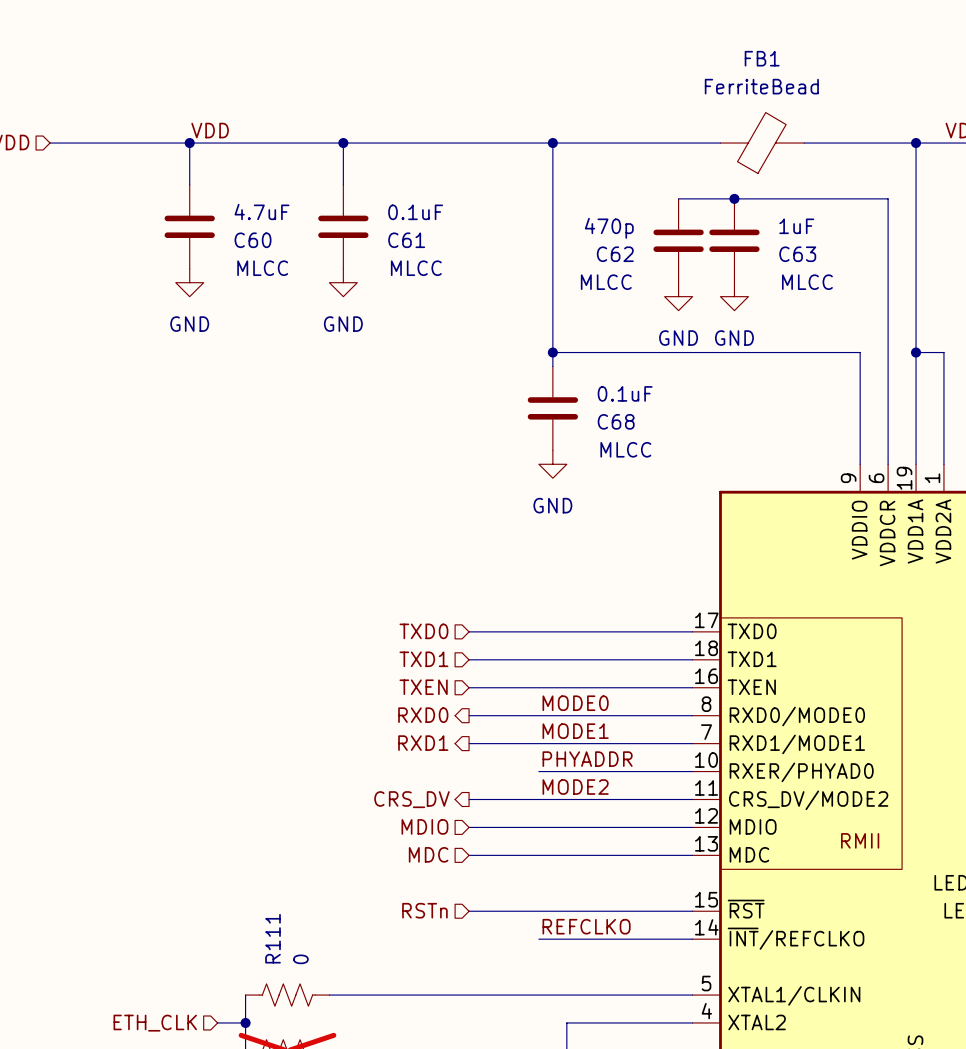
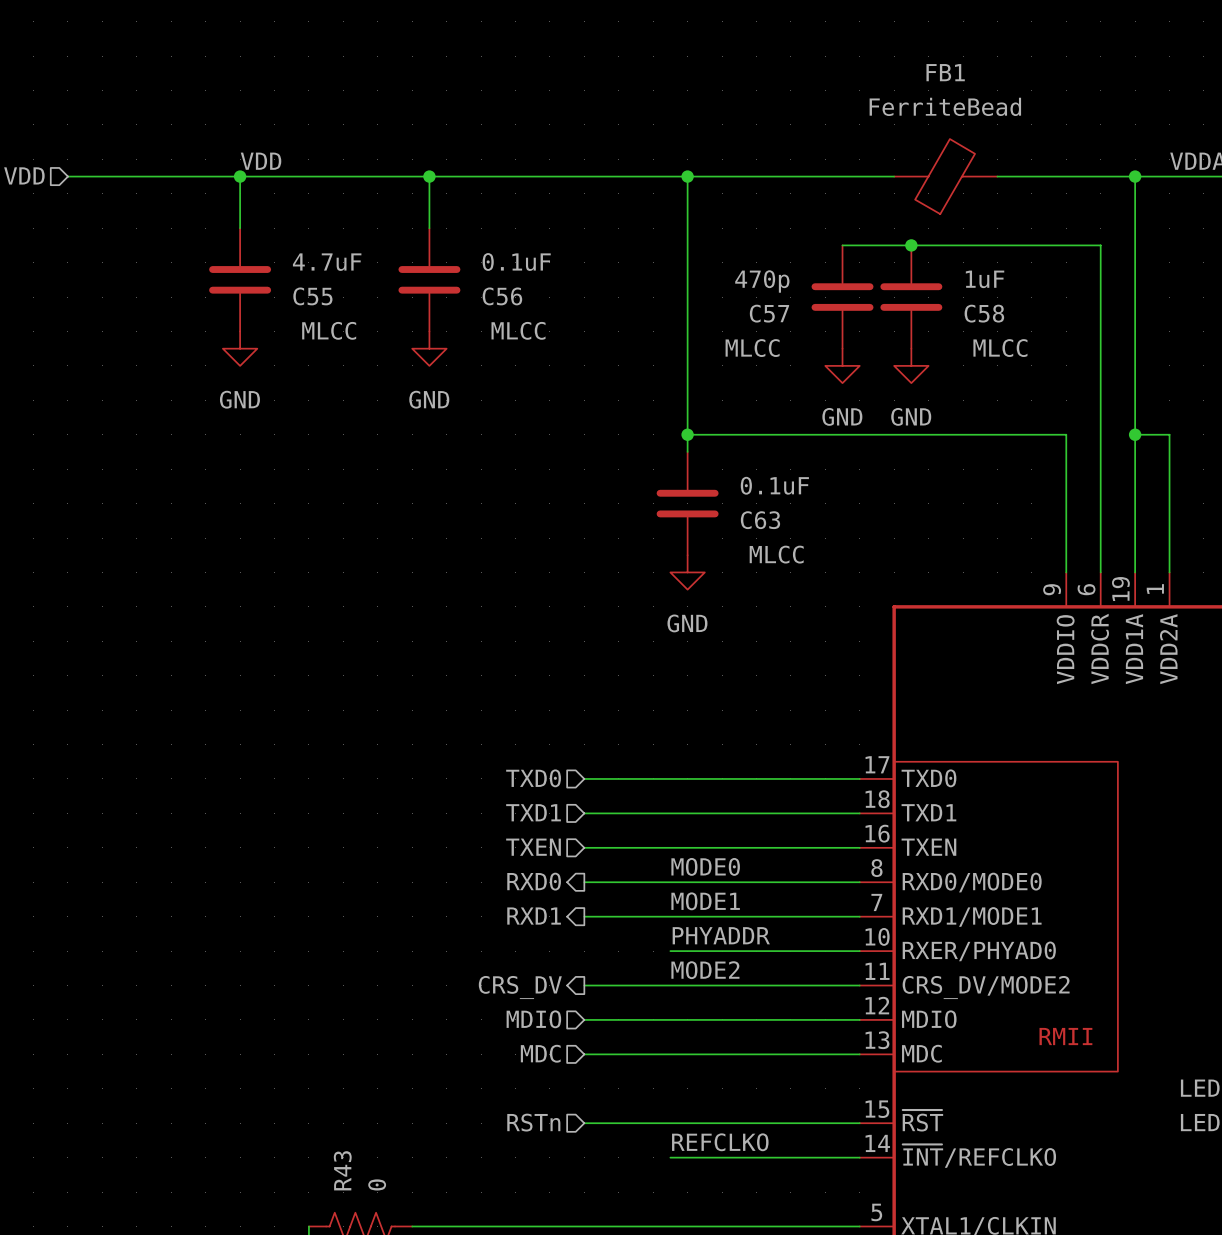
C60 name: C60 (253, 240) -> C55 (312, 296)
C61 name: C61 (406, 240) -> C56 (502, 296)
C62 name: C62 (615, 254) -> C57 (769, 313)
C63 name: C63 (797, 254) -> C58 (984, 313)
C68 name: C68 (616, 421) -> C63 (760, 520)
R111 name: R111 (272, 938) -> R43 (342, 1170)

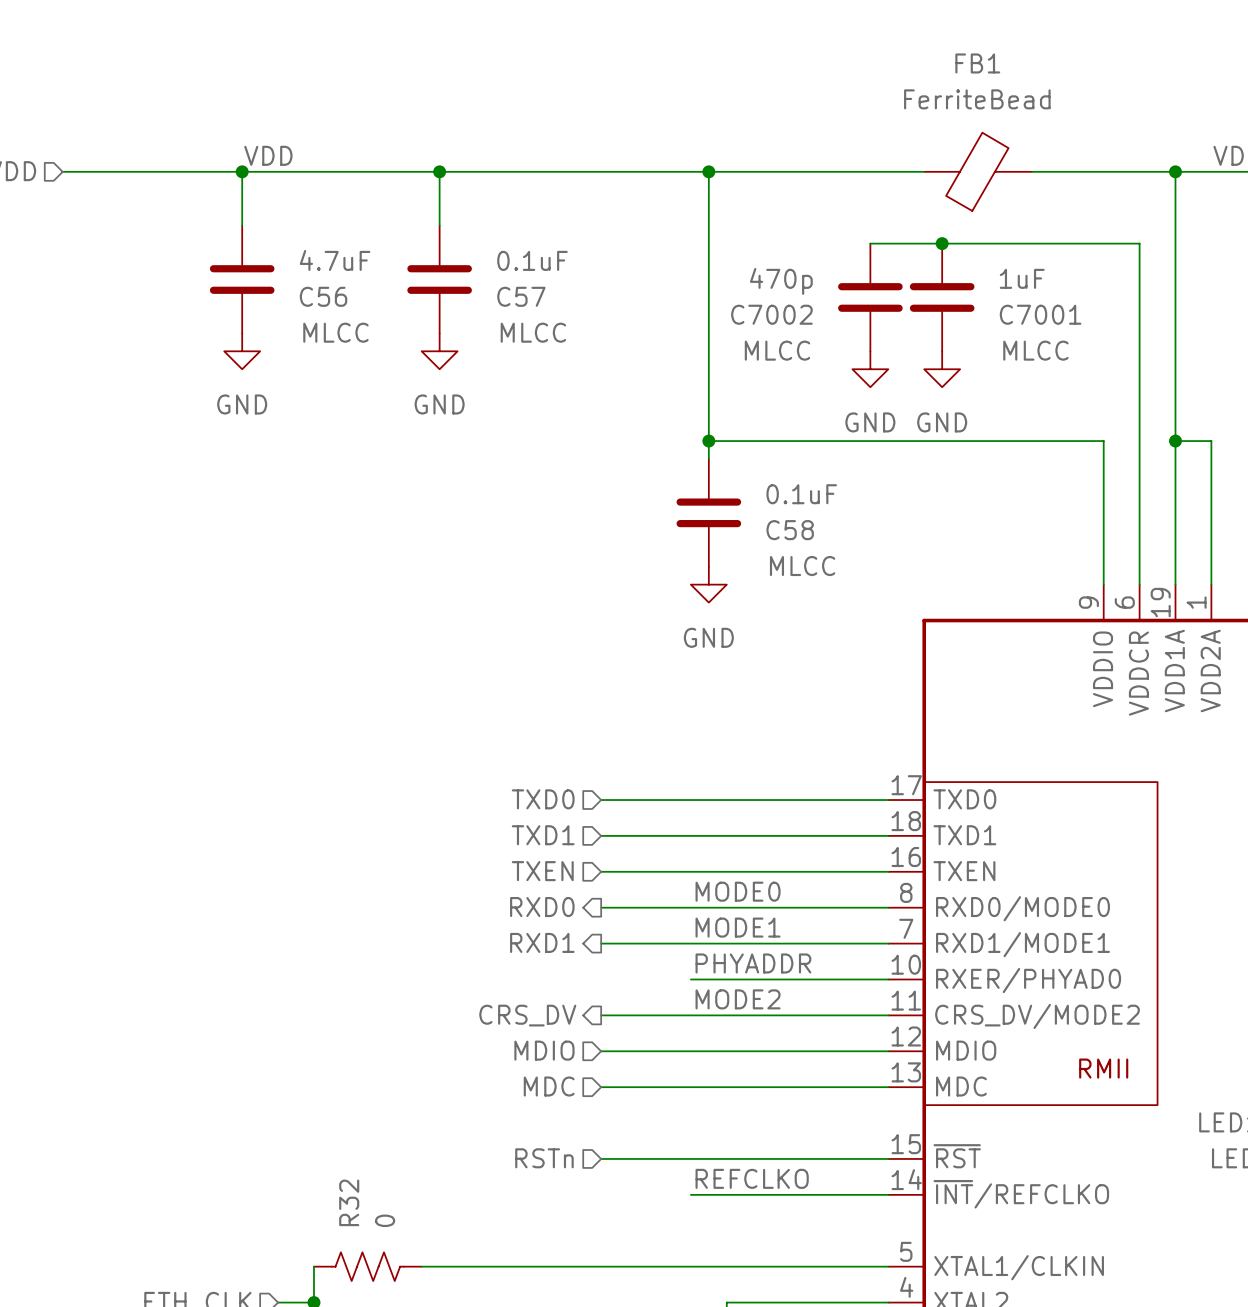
C55 name: C55 (312, 296) -> C56 (323, 296)
C56 name: C56 (502, 296) -> C57 (521, 296)
C57 name: C57 (769, 313) -> C7002 (771, 314)
C58 name: C58 (984, 313) -> C7001 (1040, 314)
C63 name: C63 (760, 520) -> C58 (790, 530)
R43 name: R43 (342, 1170) -> R32 (349, 1202)

